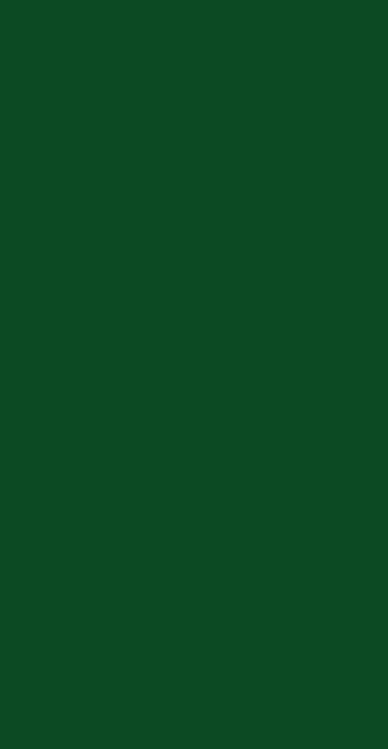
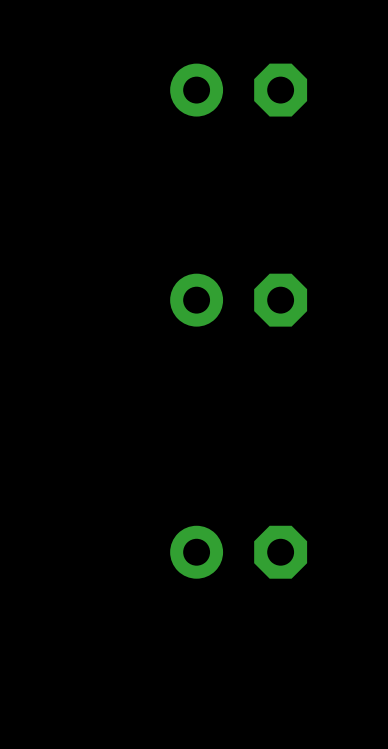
part: none -> (238, 90)
part: none -> (238, 300)
part: none -> (238, 552)

